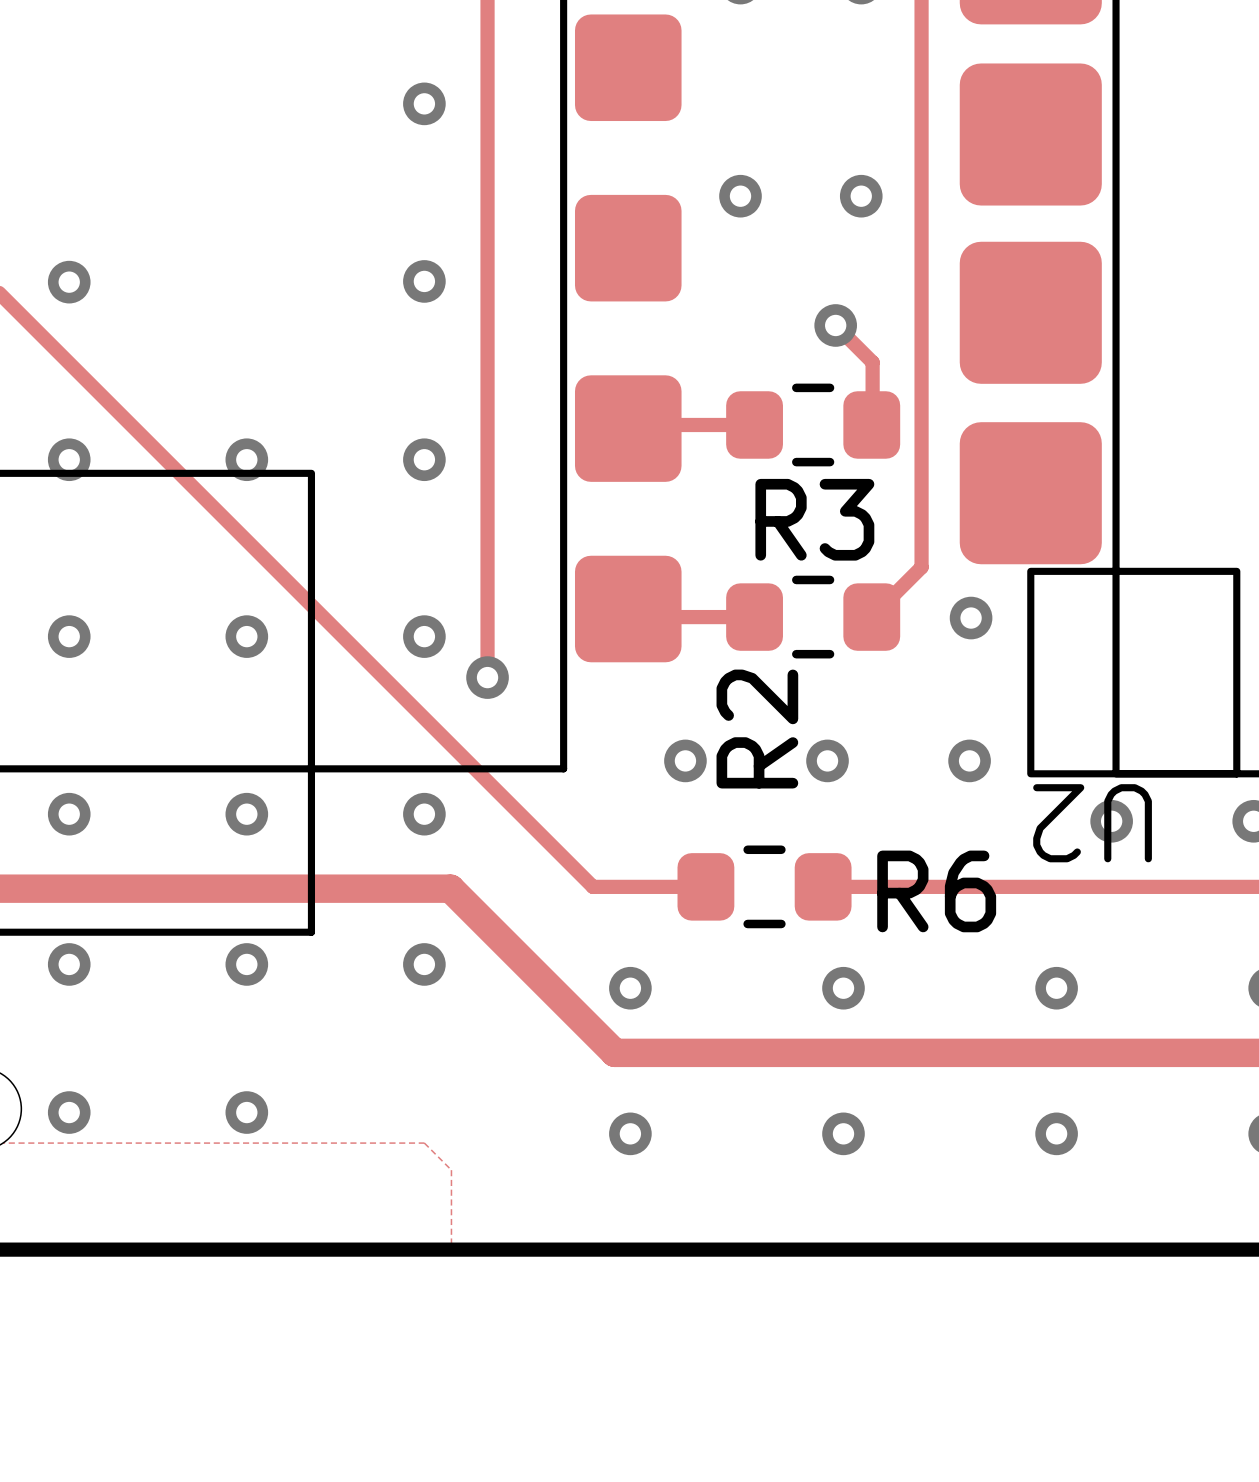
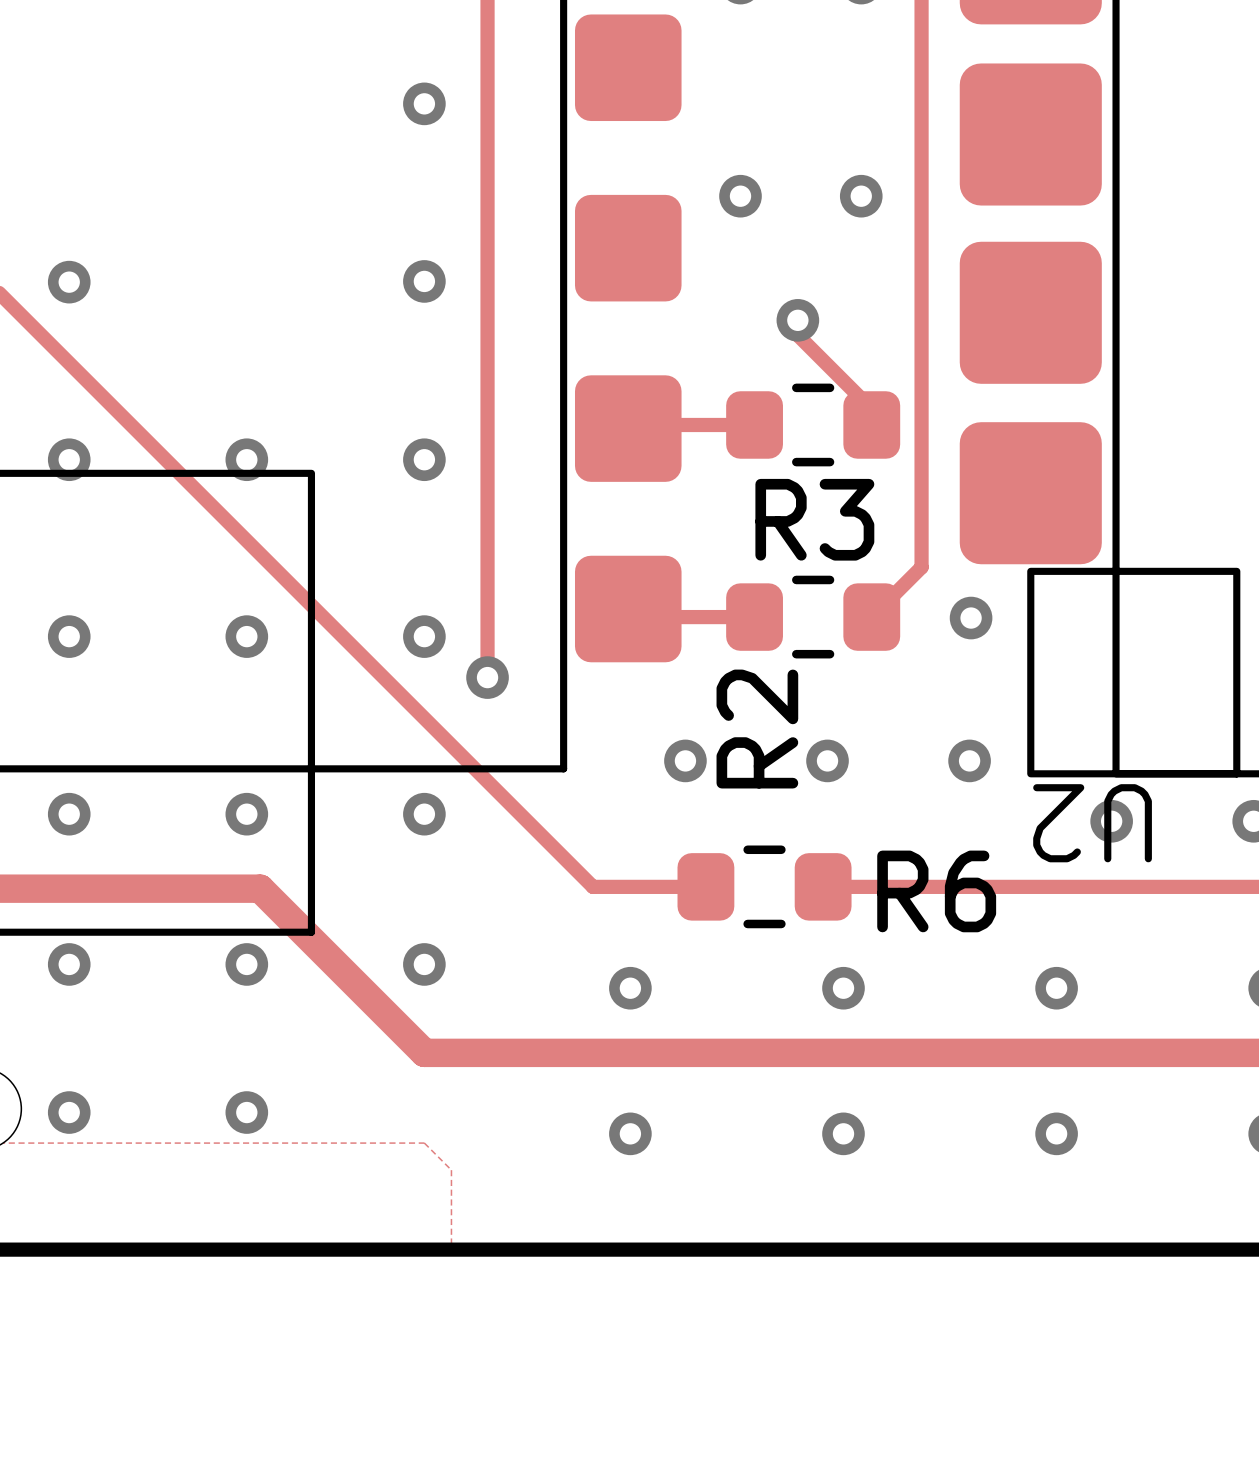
track: (835, 325) (872, 362) (872, 424) -> (797, 320) (797, 335) (871, 409) (871, 424)
via position: (835, 325) -> (797, 320)
track: (260, 888) (450, 888) (614, 1052) -> (260, 888) (424, 1052) (614, 1052)

